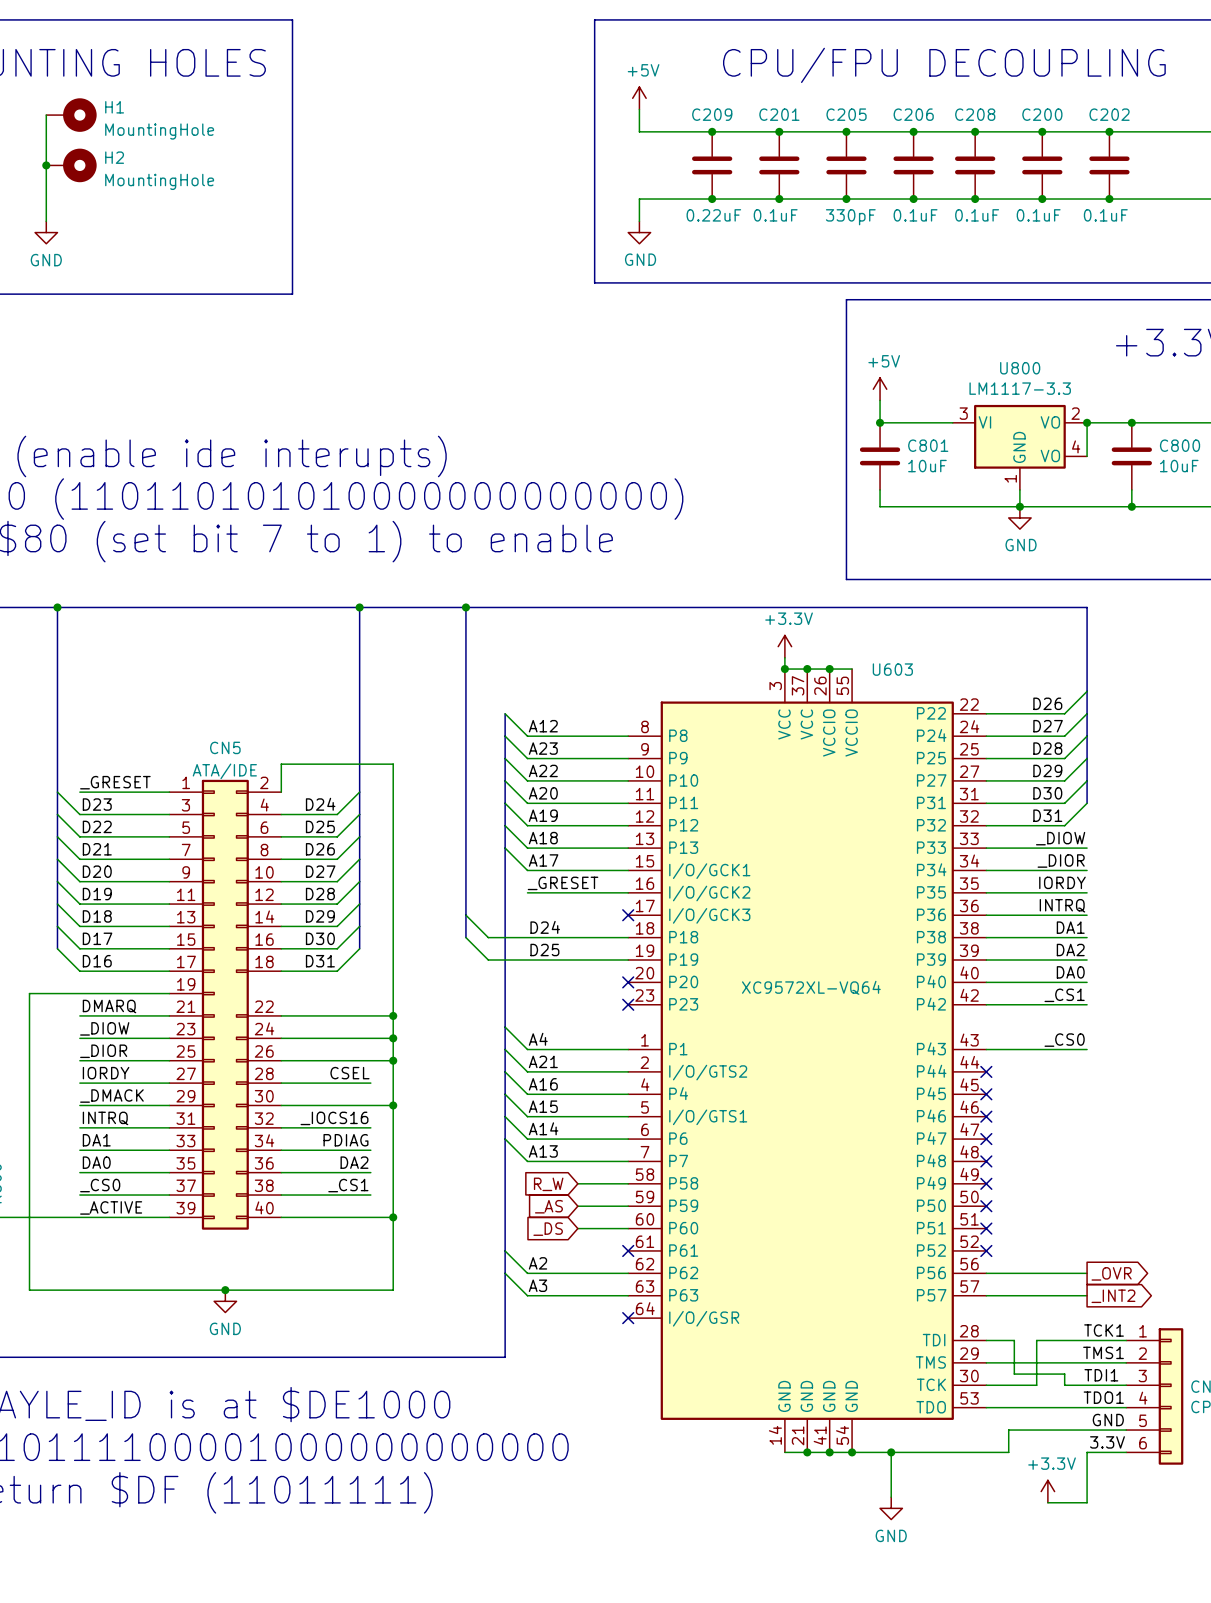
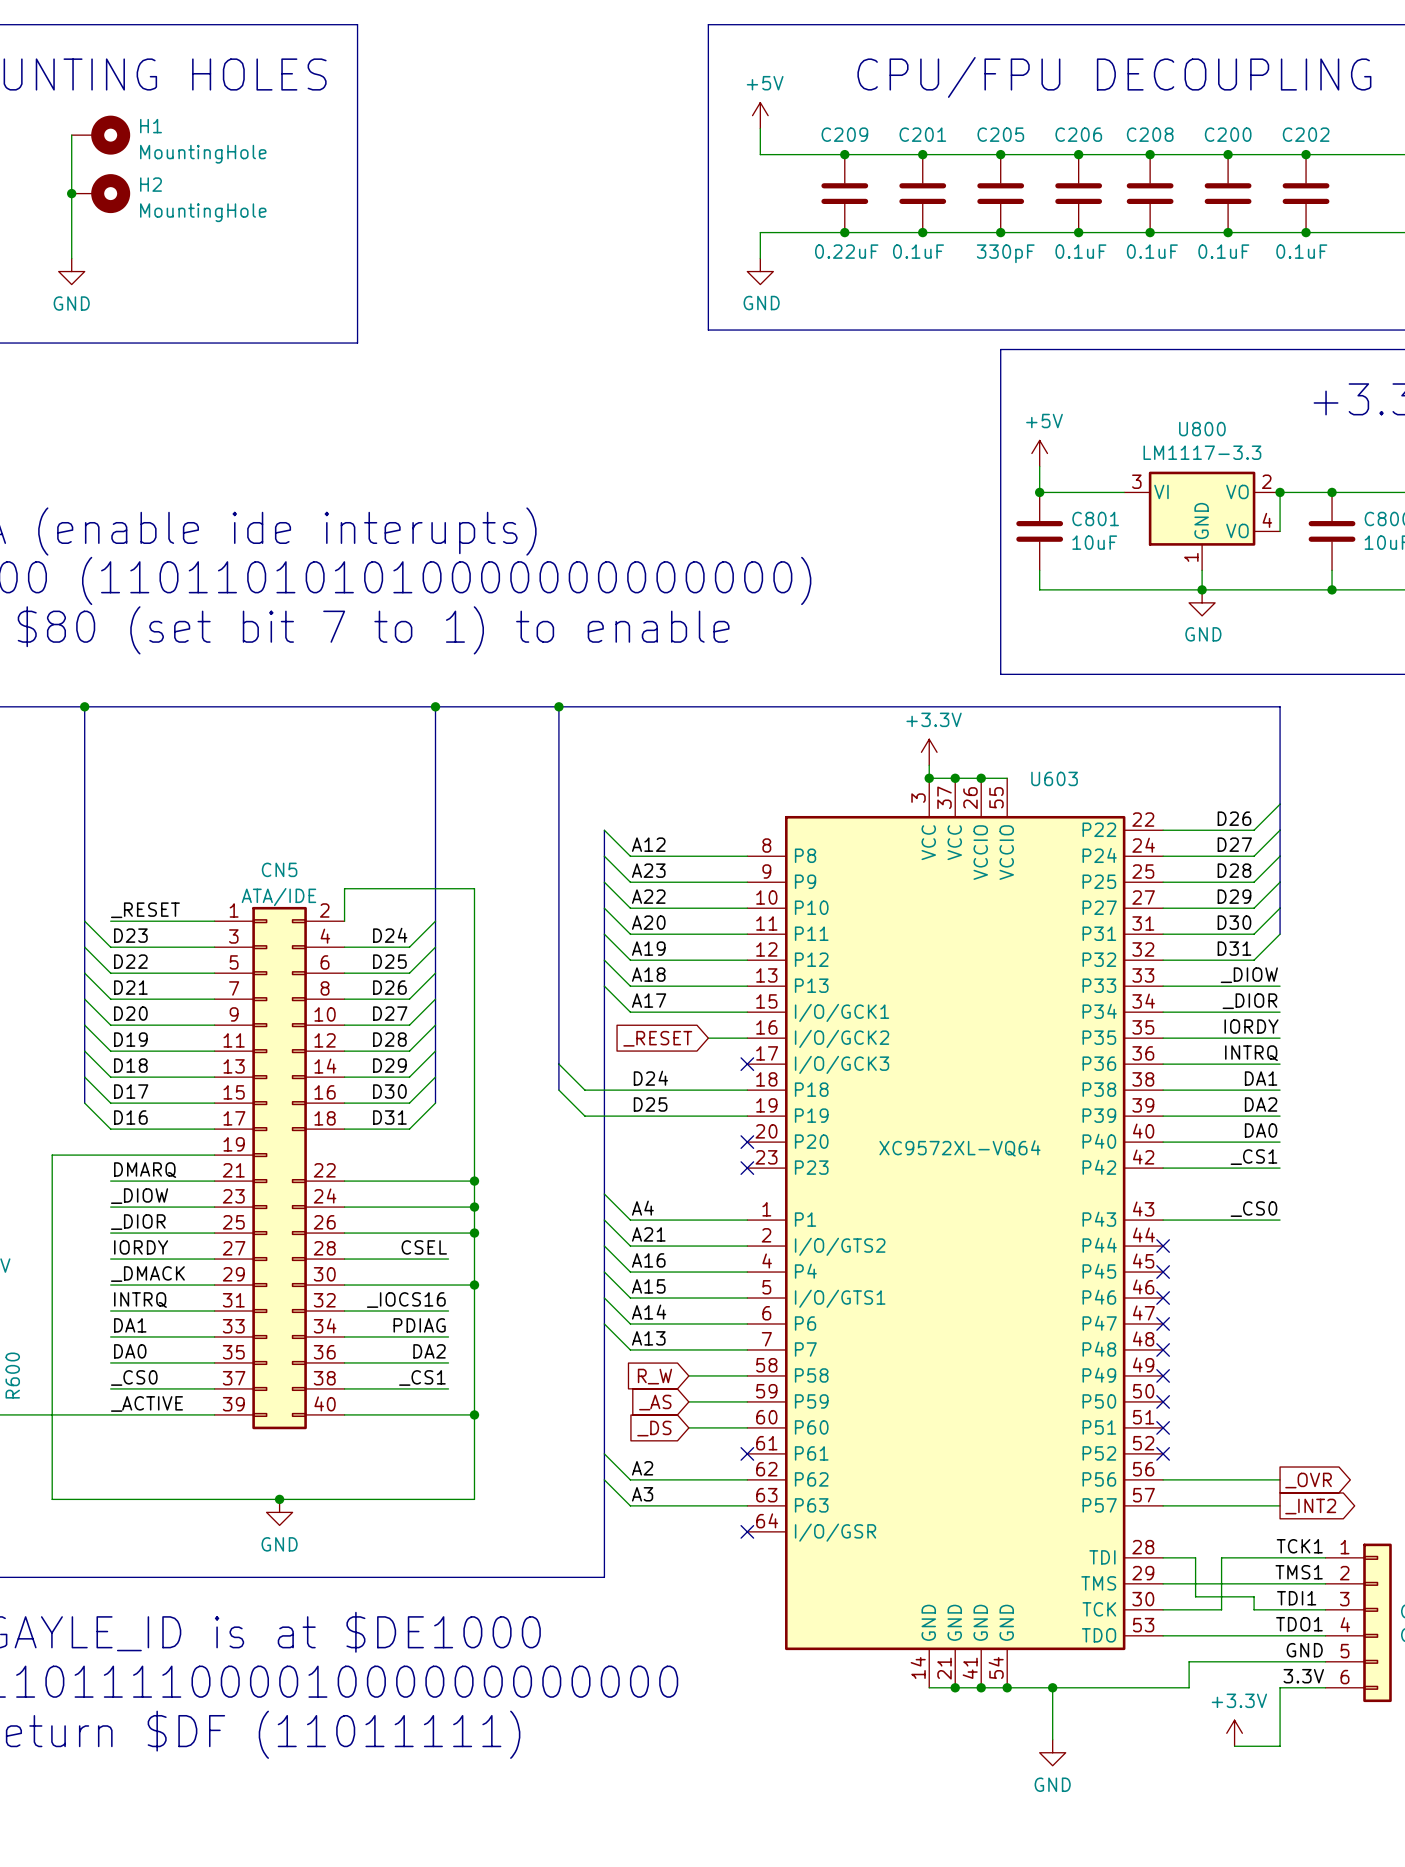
label: _GRESET (115, 782) -> _RESET (145, 910)
label: _GRESET (563, 883) -> none
wire: (527, 892) (594, 892) -> none
global label: none -> _RESET (657, 1038)

